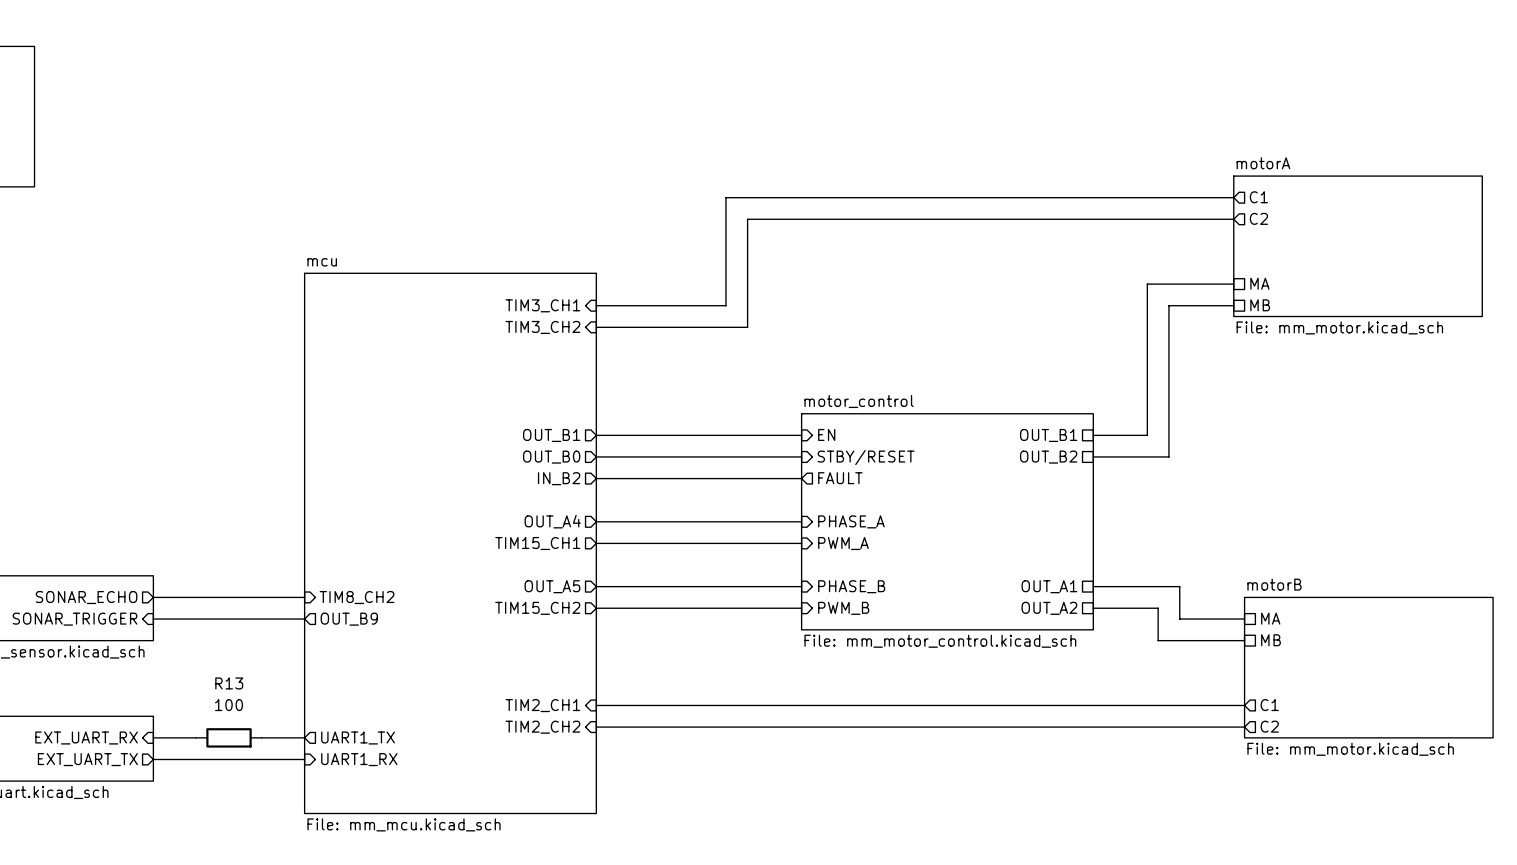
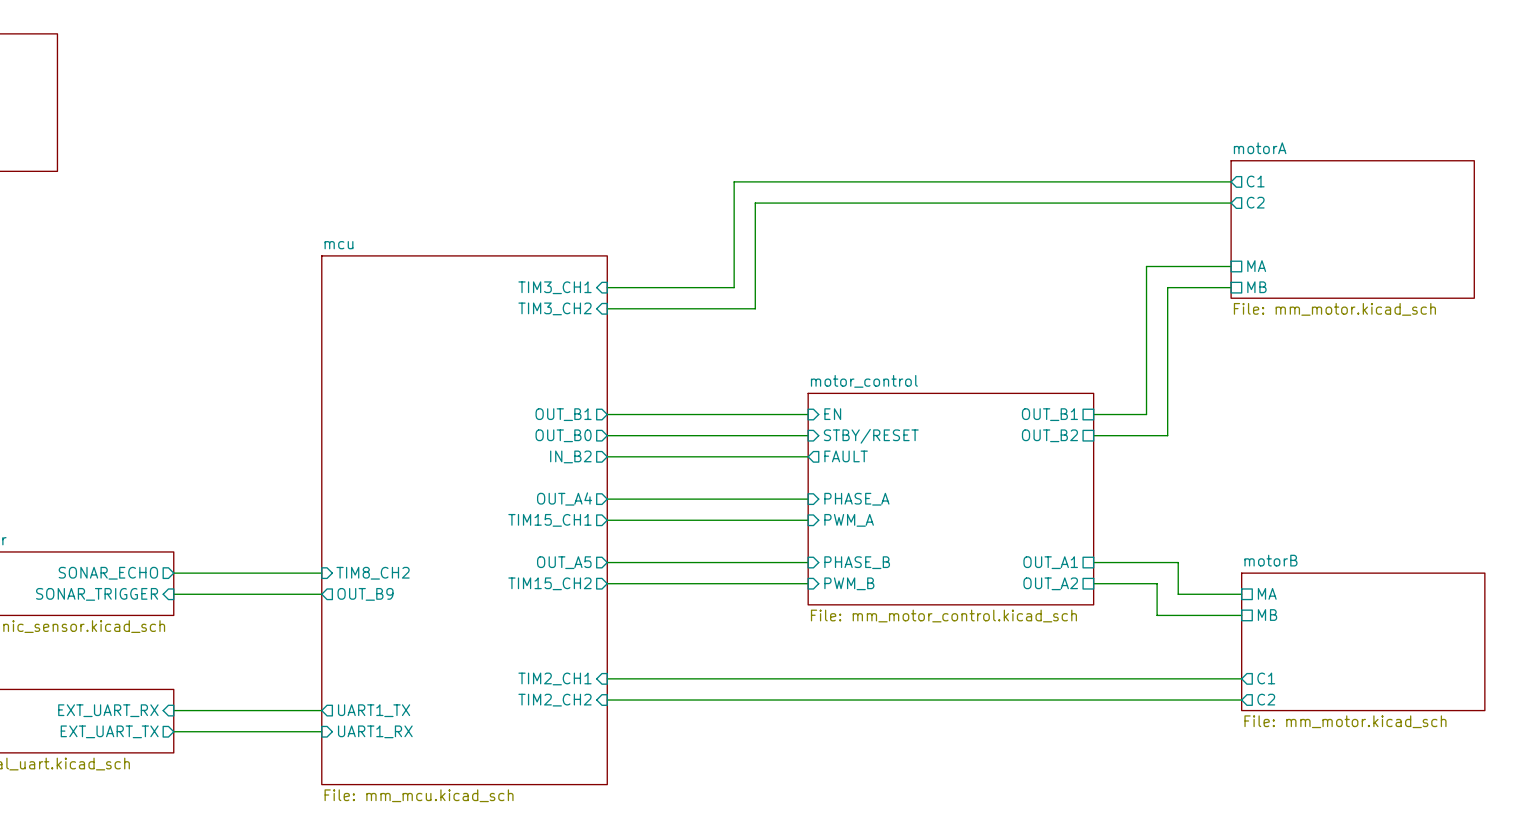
wire: none -> (216, 710) (279, 710)
R13: 100 (229, 737) -> none

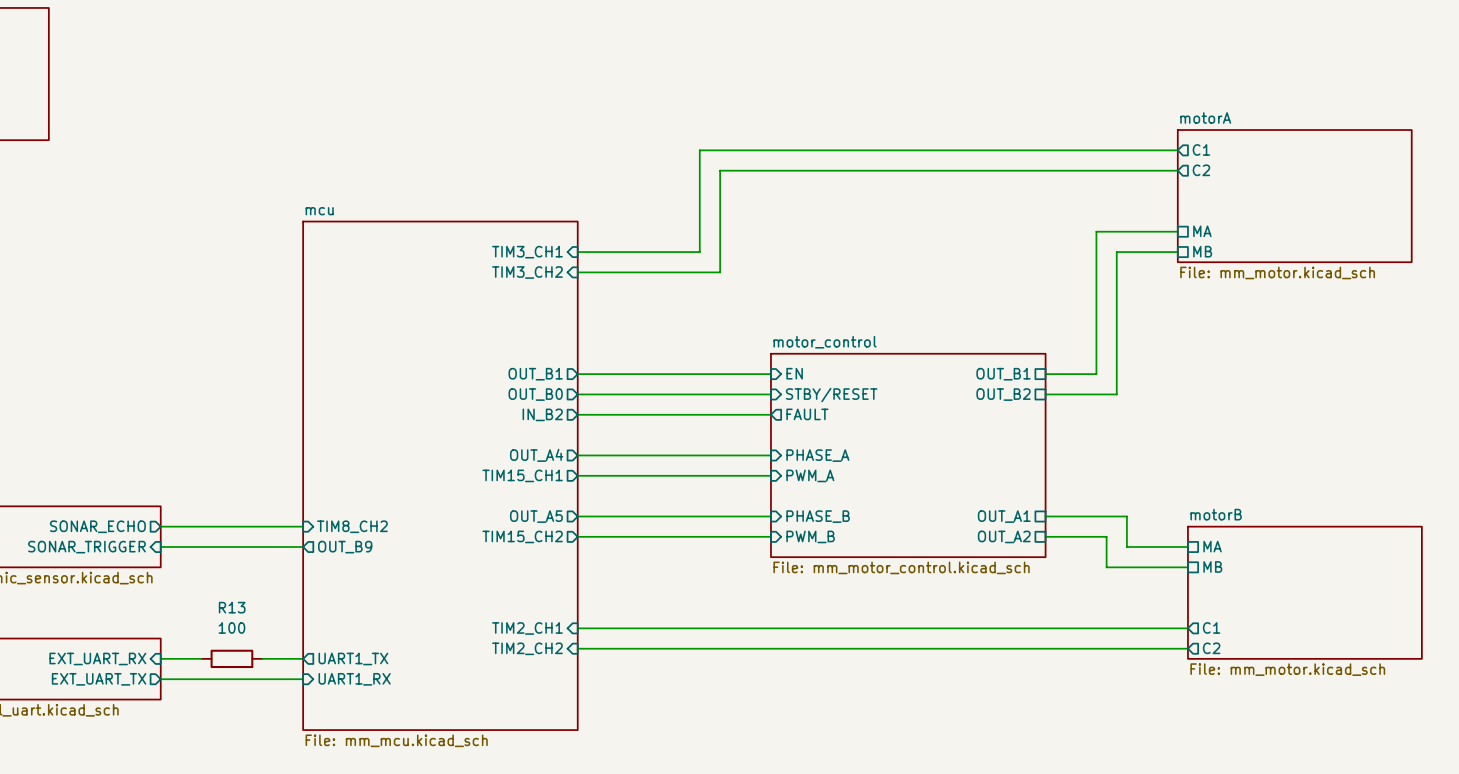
wire: (216, 710) (279, 710) -> none
R13: none -> 100 (231, 658)

